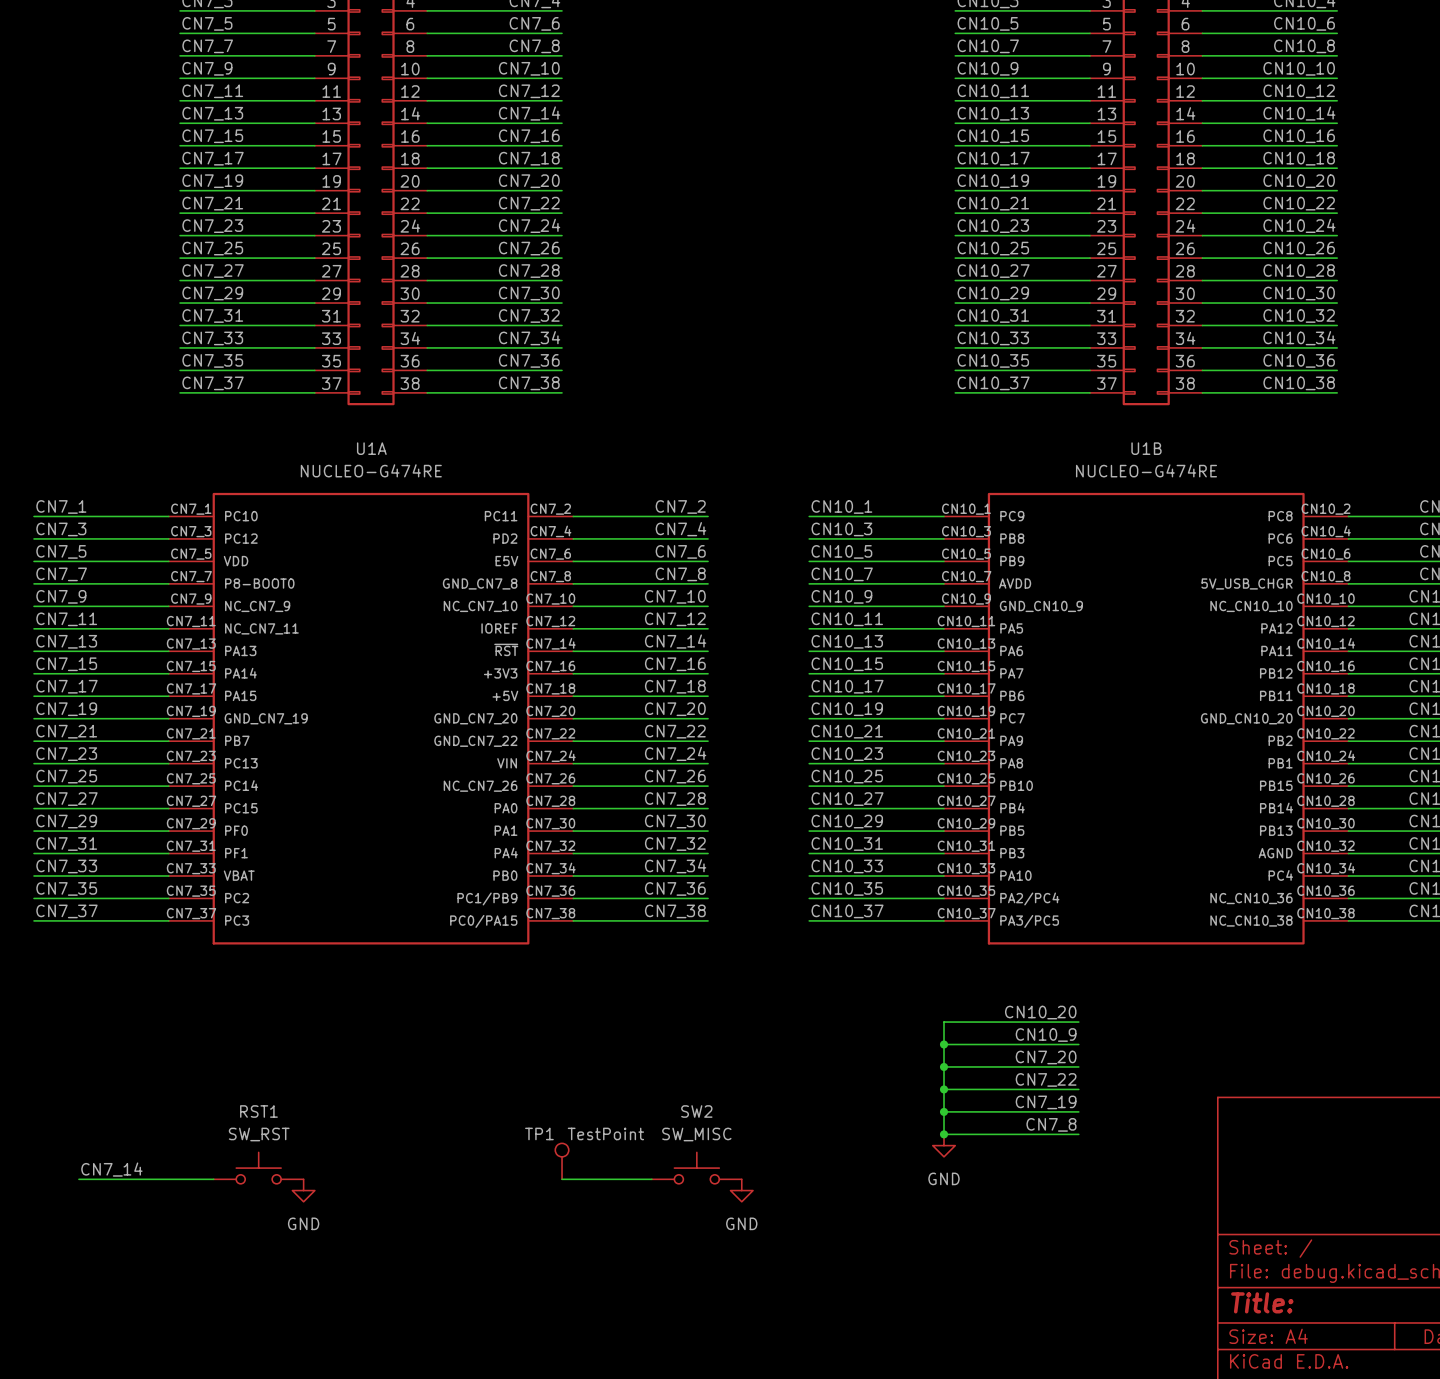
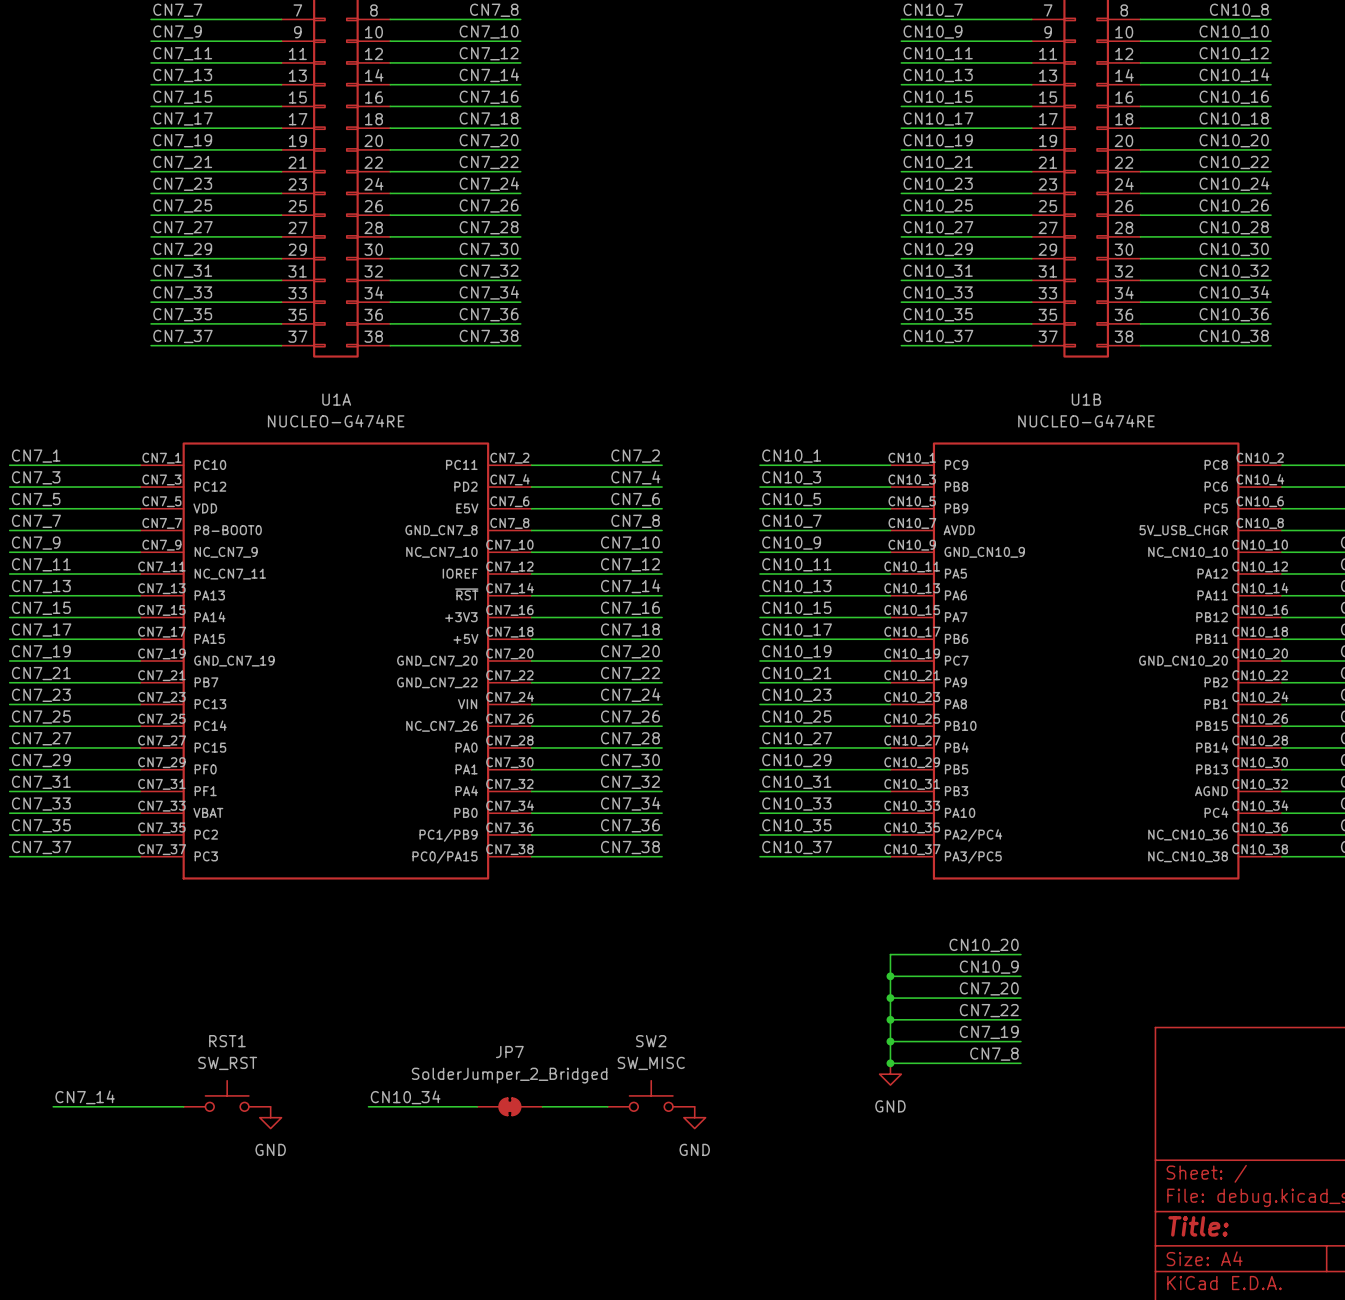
TP1: TestPoint (562, 1161) -> none
label: none -> CN10_34 (405, 1097)
wire: none -> (368, 1106) (477, 1106)
JP7: none -> SolderJumper_2_Bridged (509, 1106)

